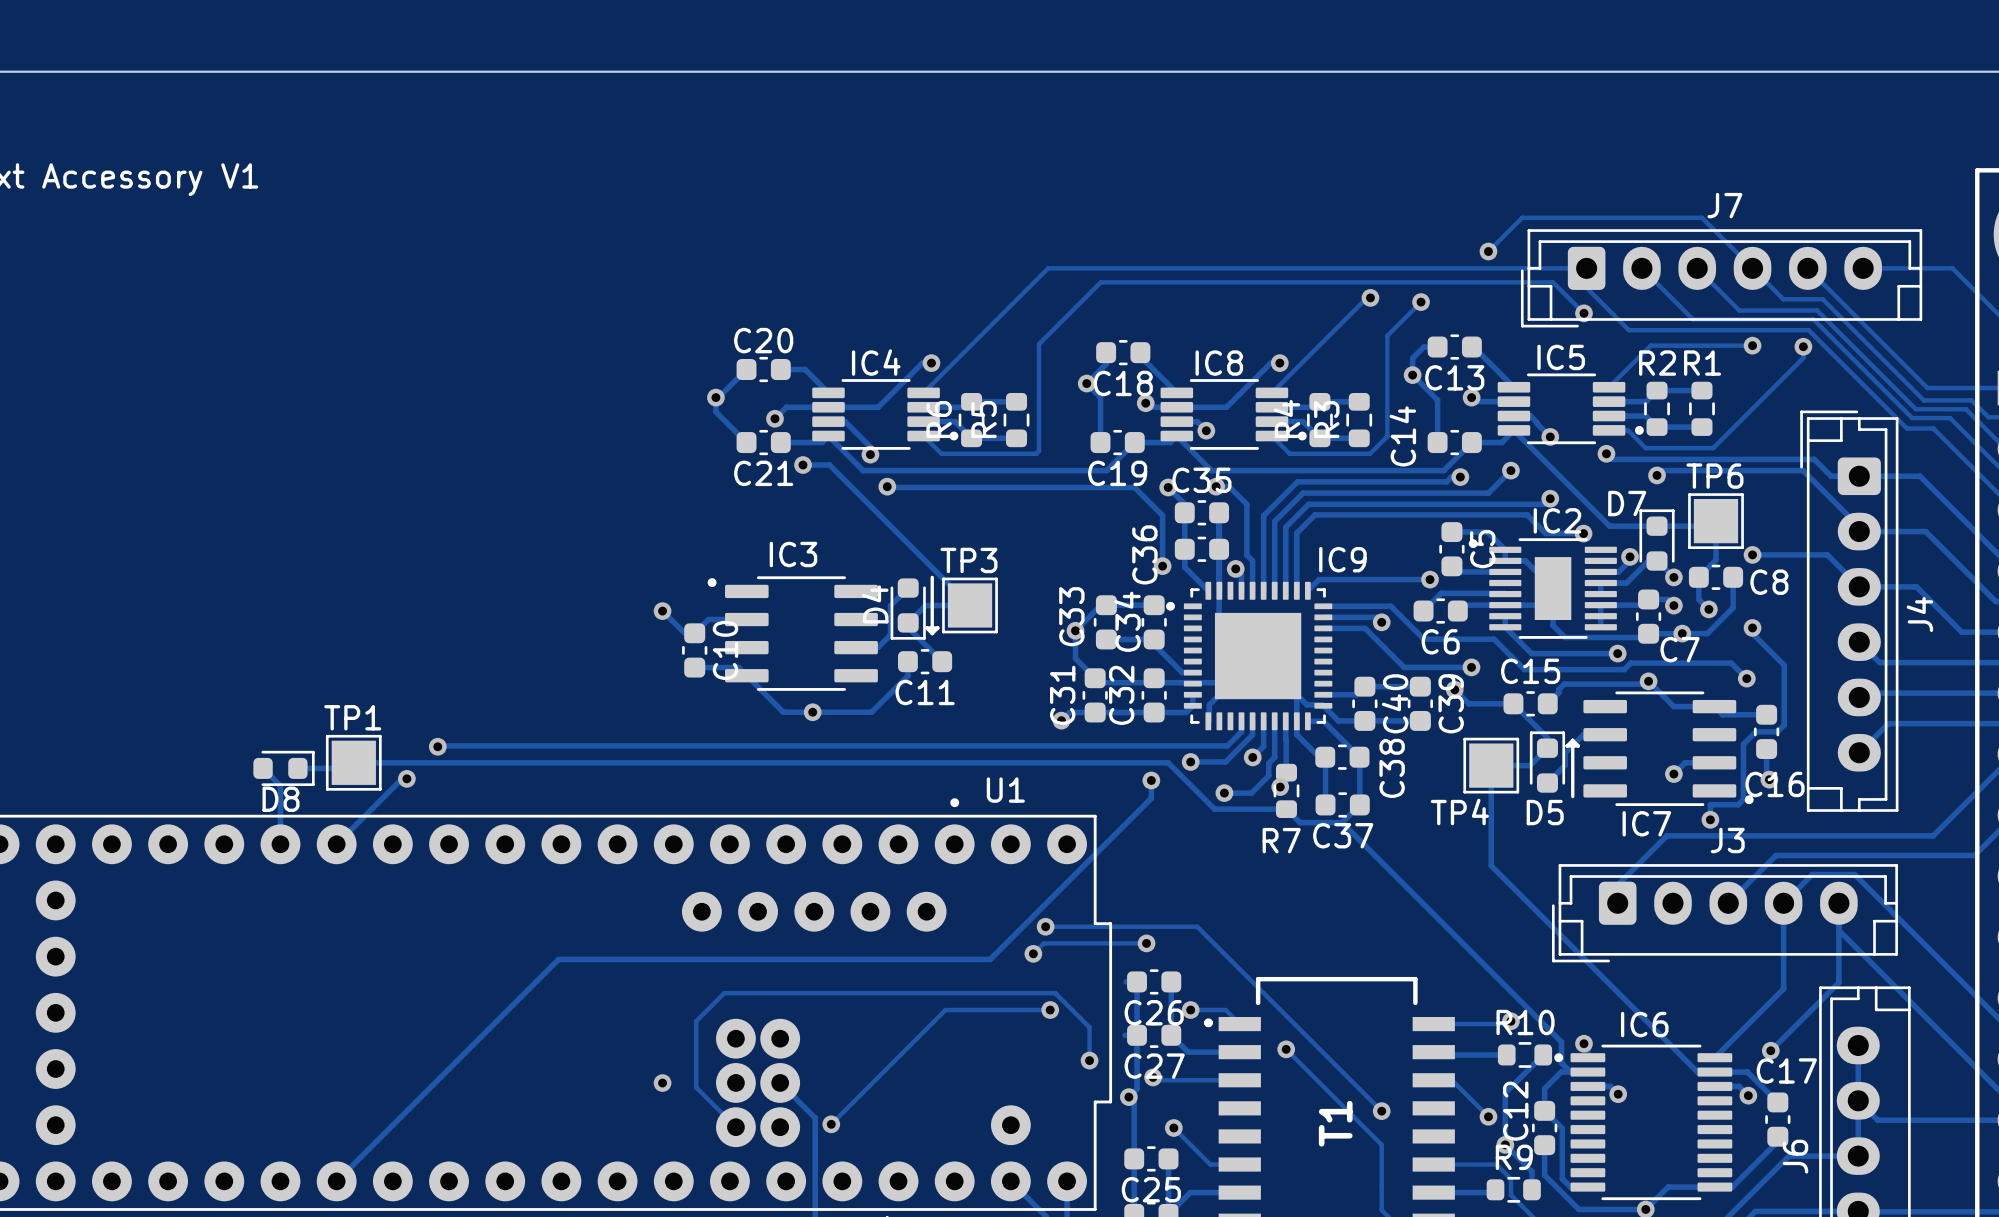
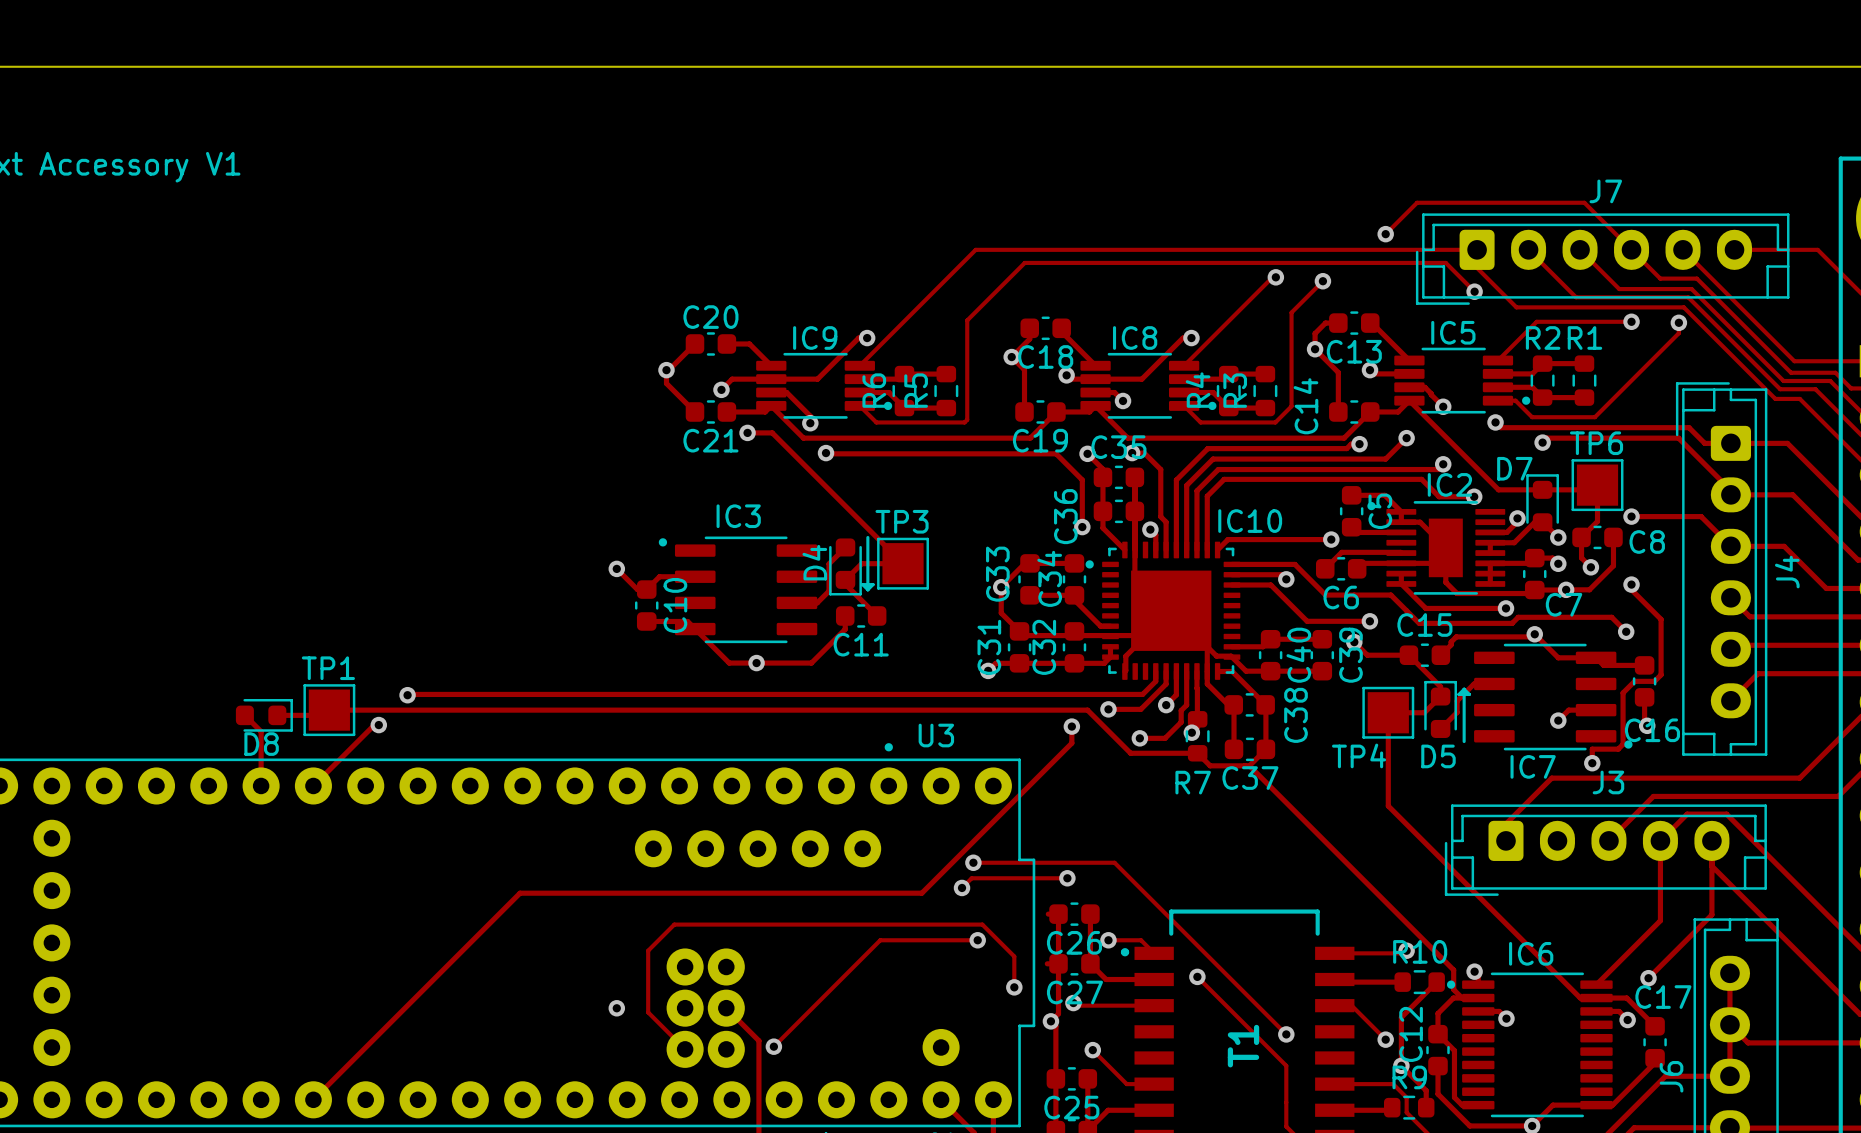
IC4 name: IC4 (876, 362) -> IC9 (815, 337)
IC9 name: IC9 (1342, 559) -> IC10 (1250, 521)
U1 name: U1 (1005, 790) -> U3 (936, 735)

